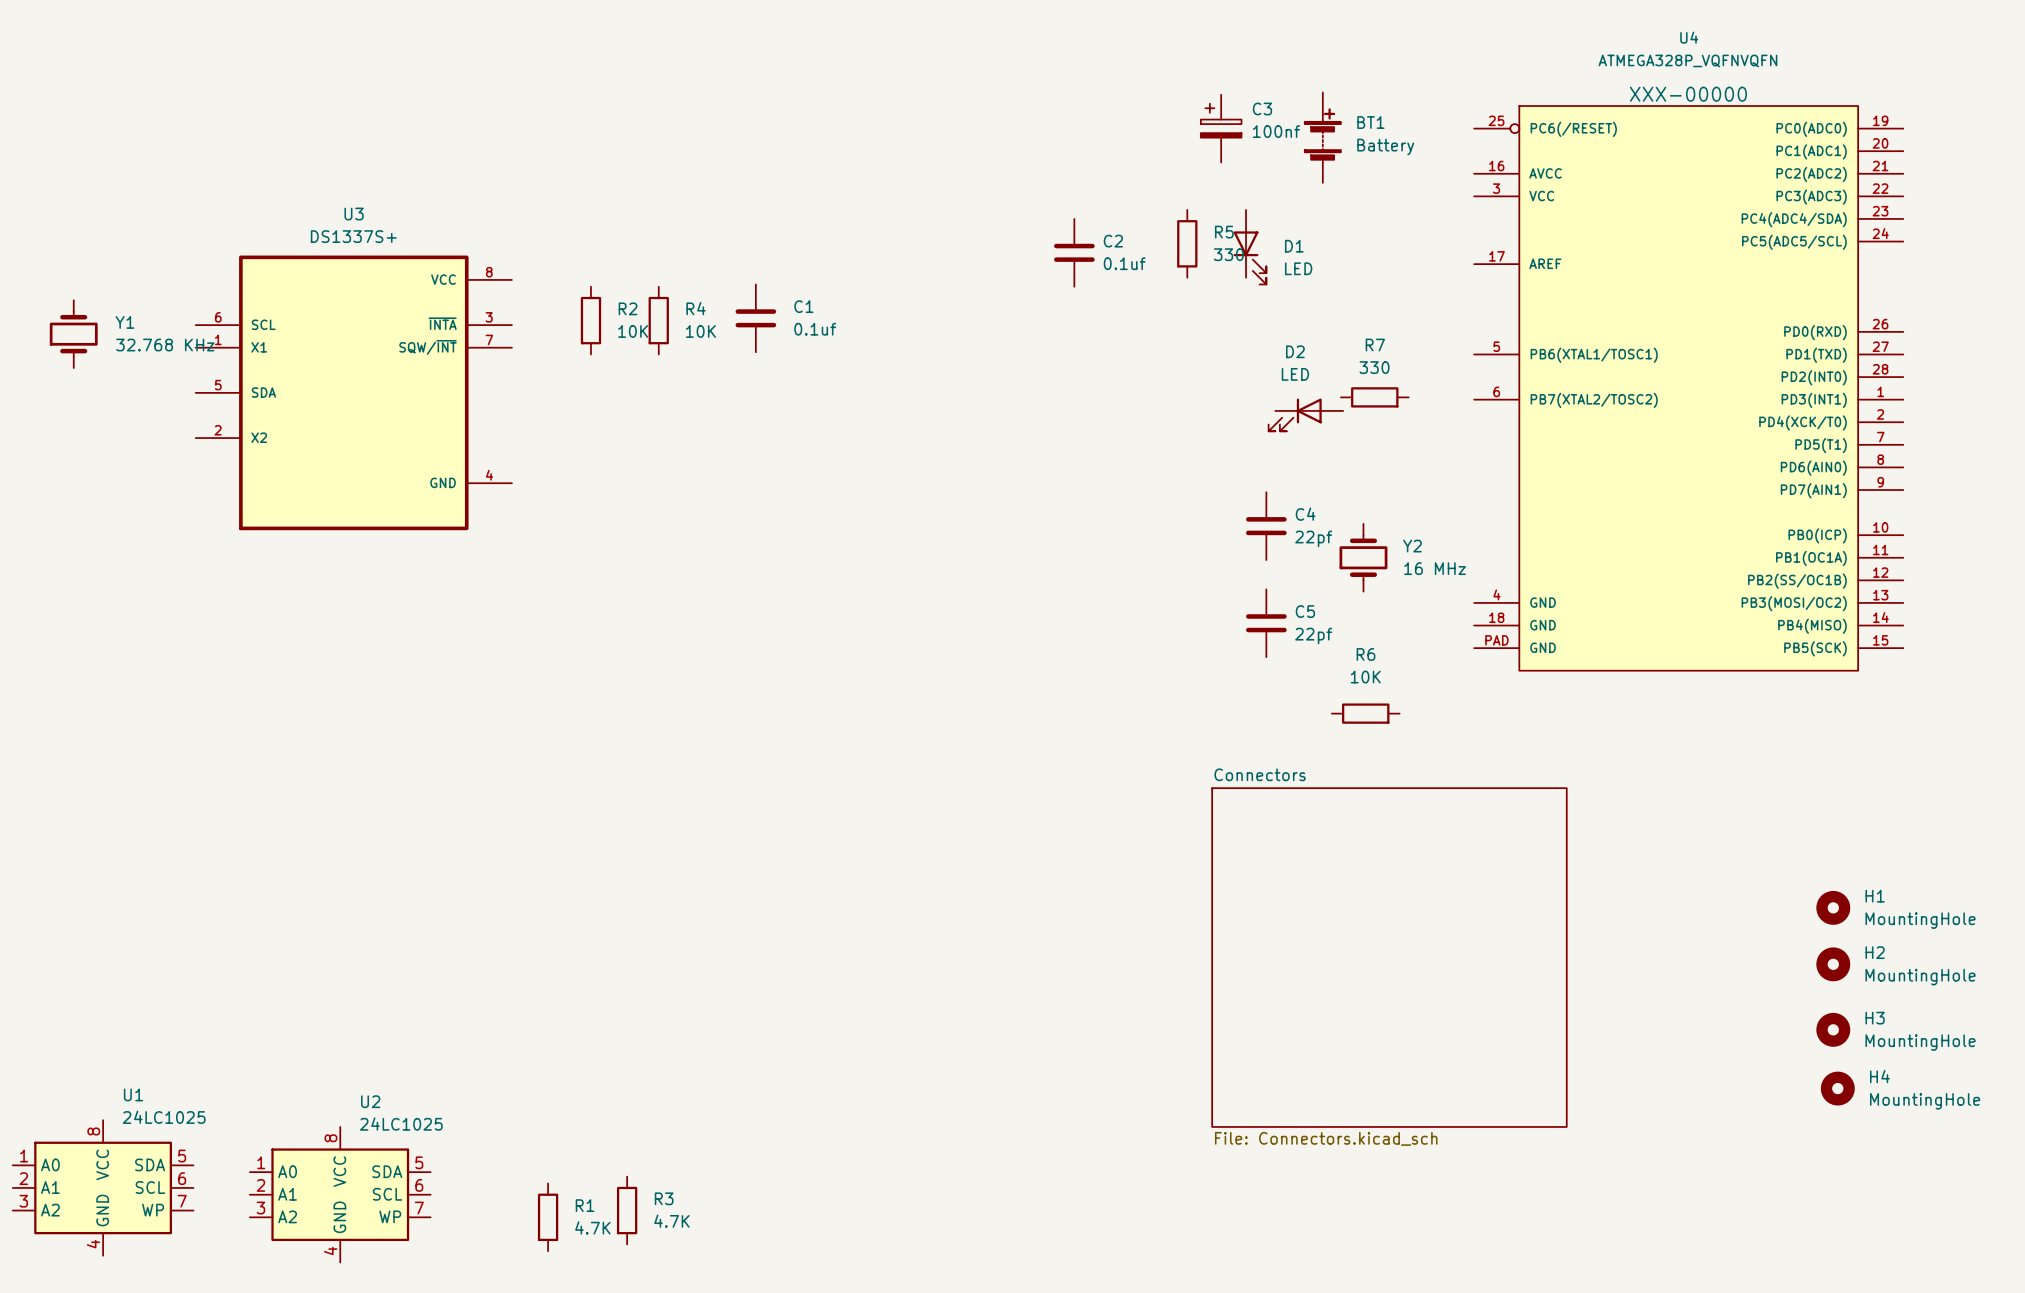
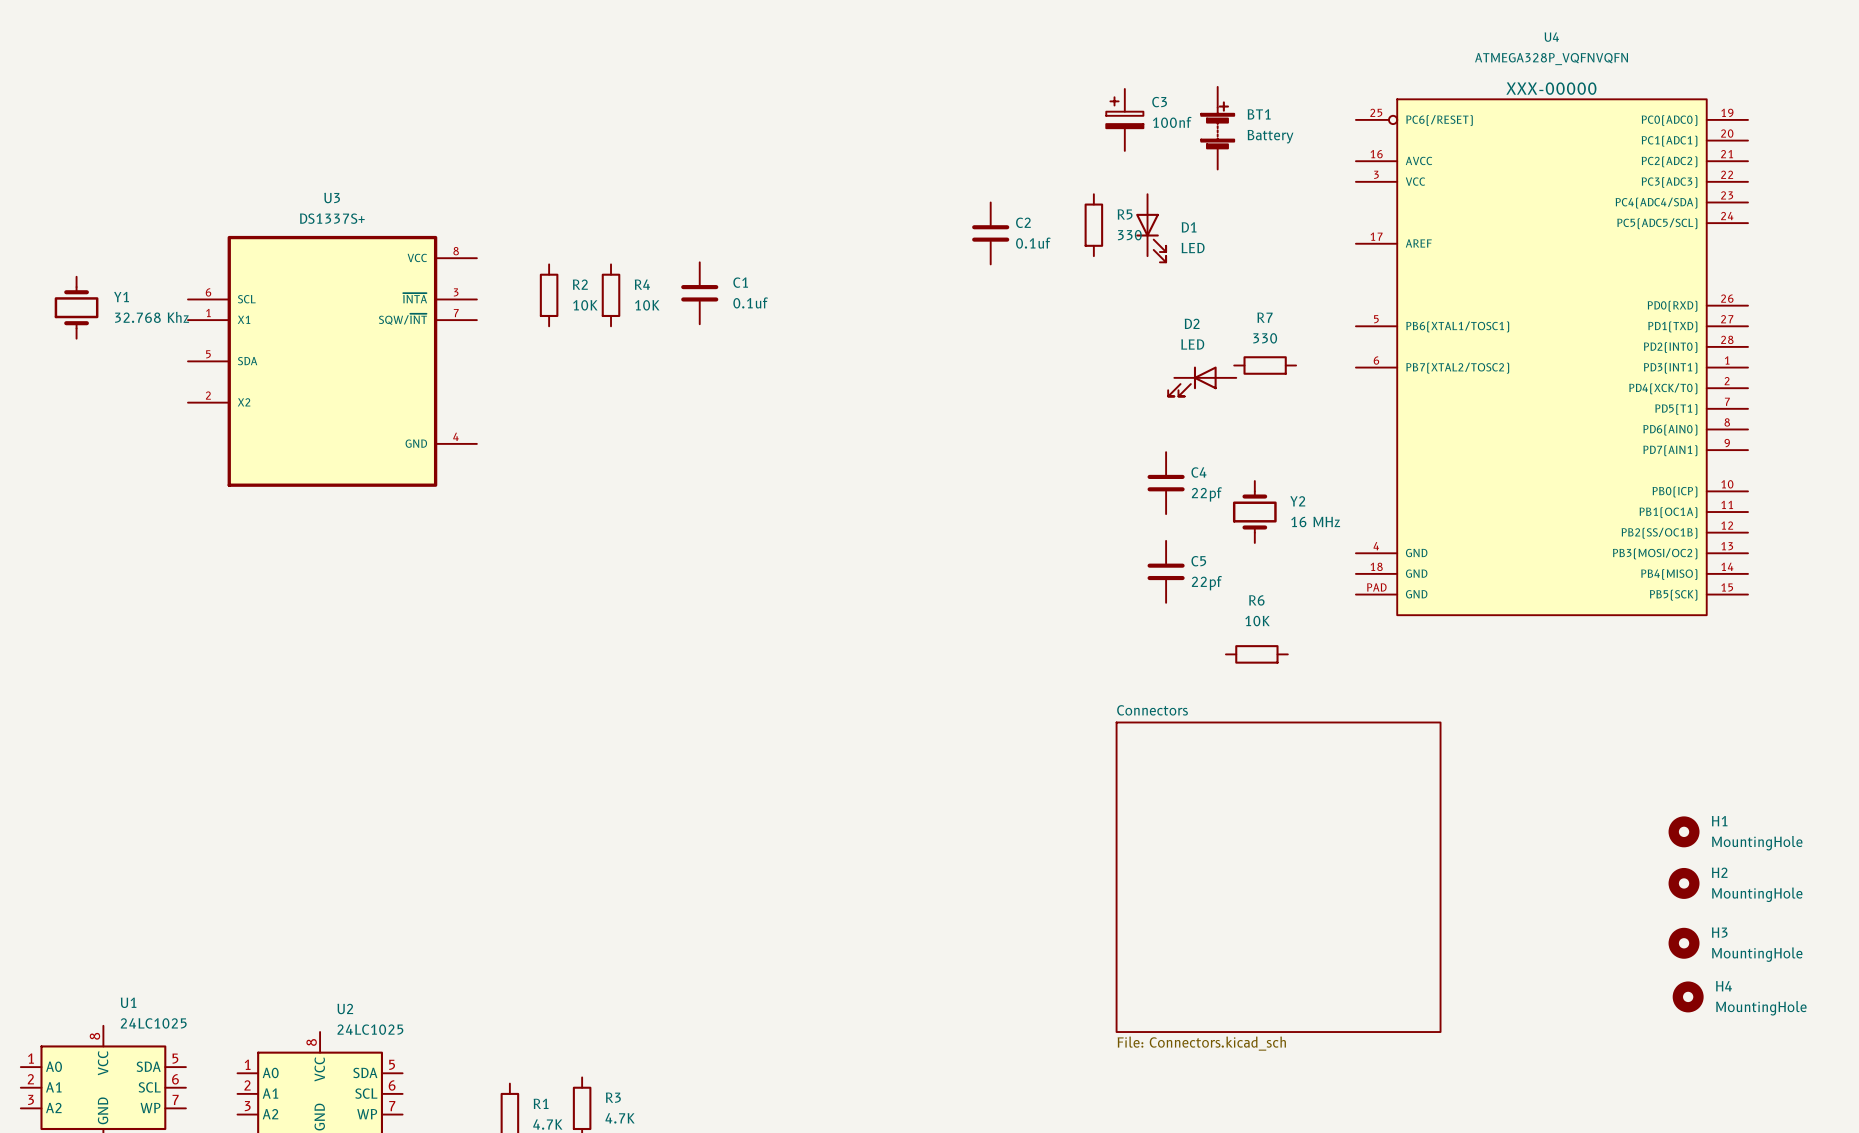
Y1 value: 32.768 KHz (165, 345) -> 32.768 Khz (152, 317)

